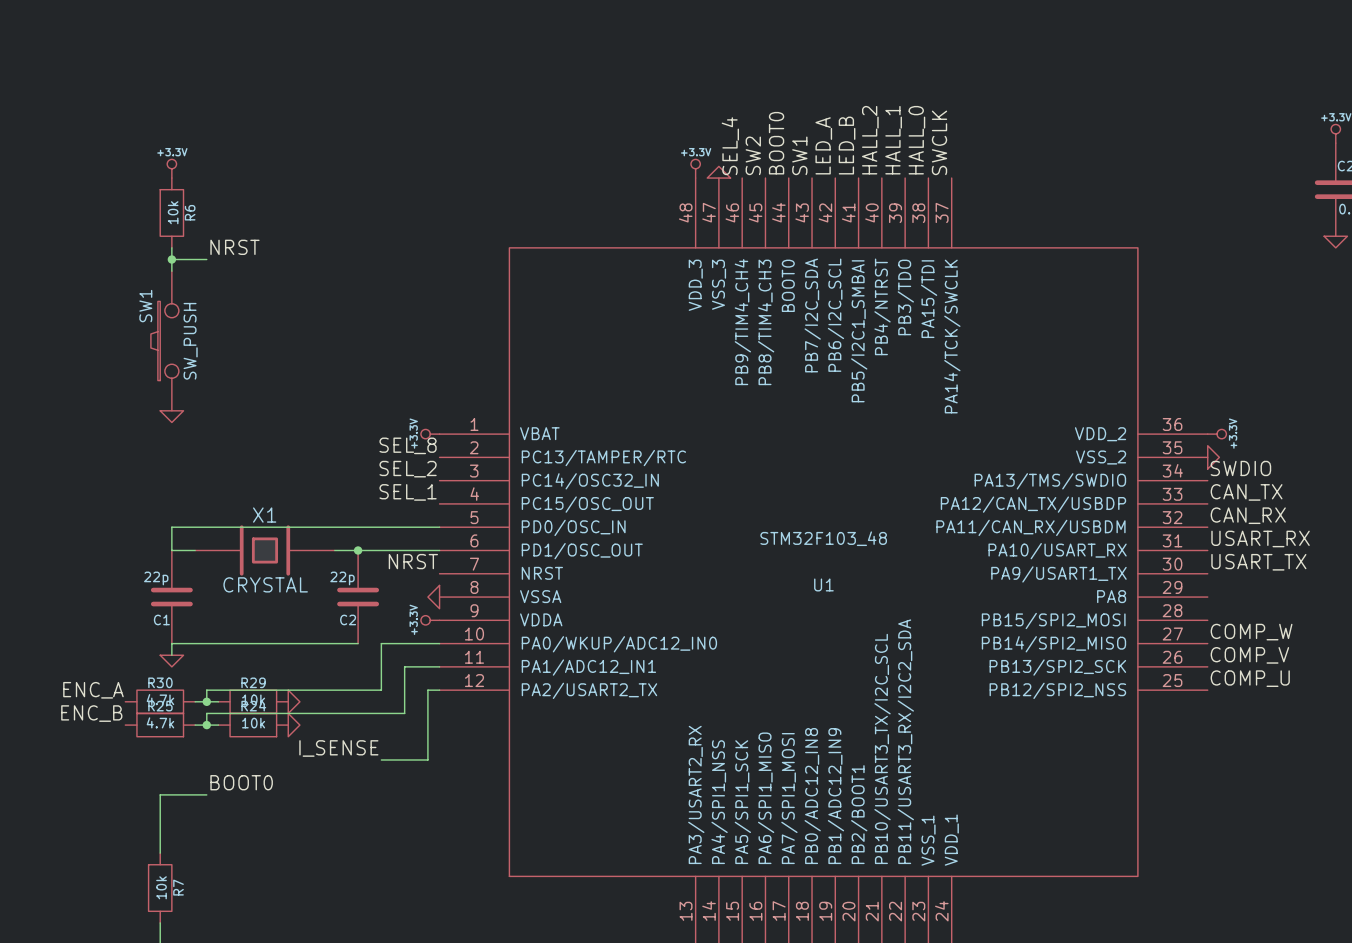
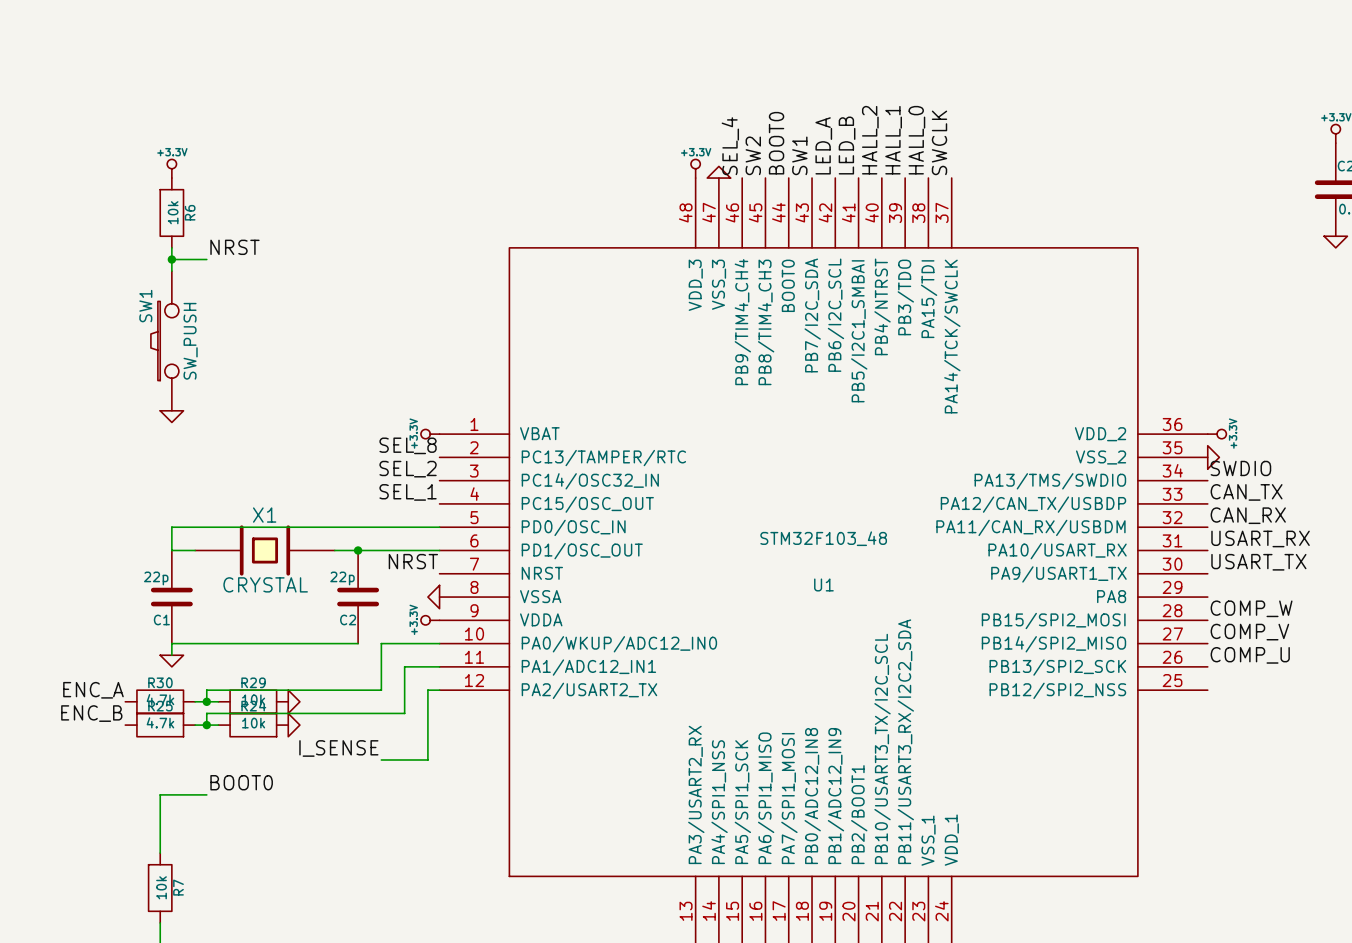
label: none -> COMP_W (1251, 608)
label: COMP_W (1251, 632) -> COMP_V (1249, 632)
label: COMP_V (1249, 655) -> COMP_U (1250, 655)
label: COMP_U (1250, 678) -> none

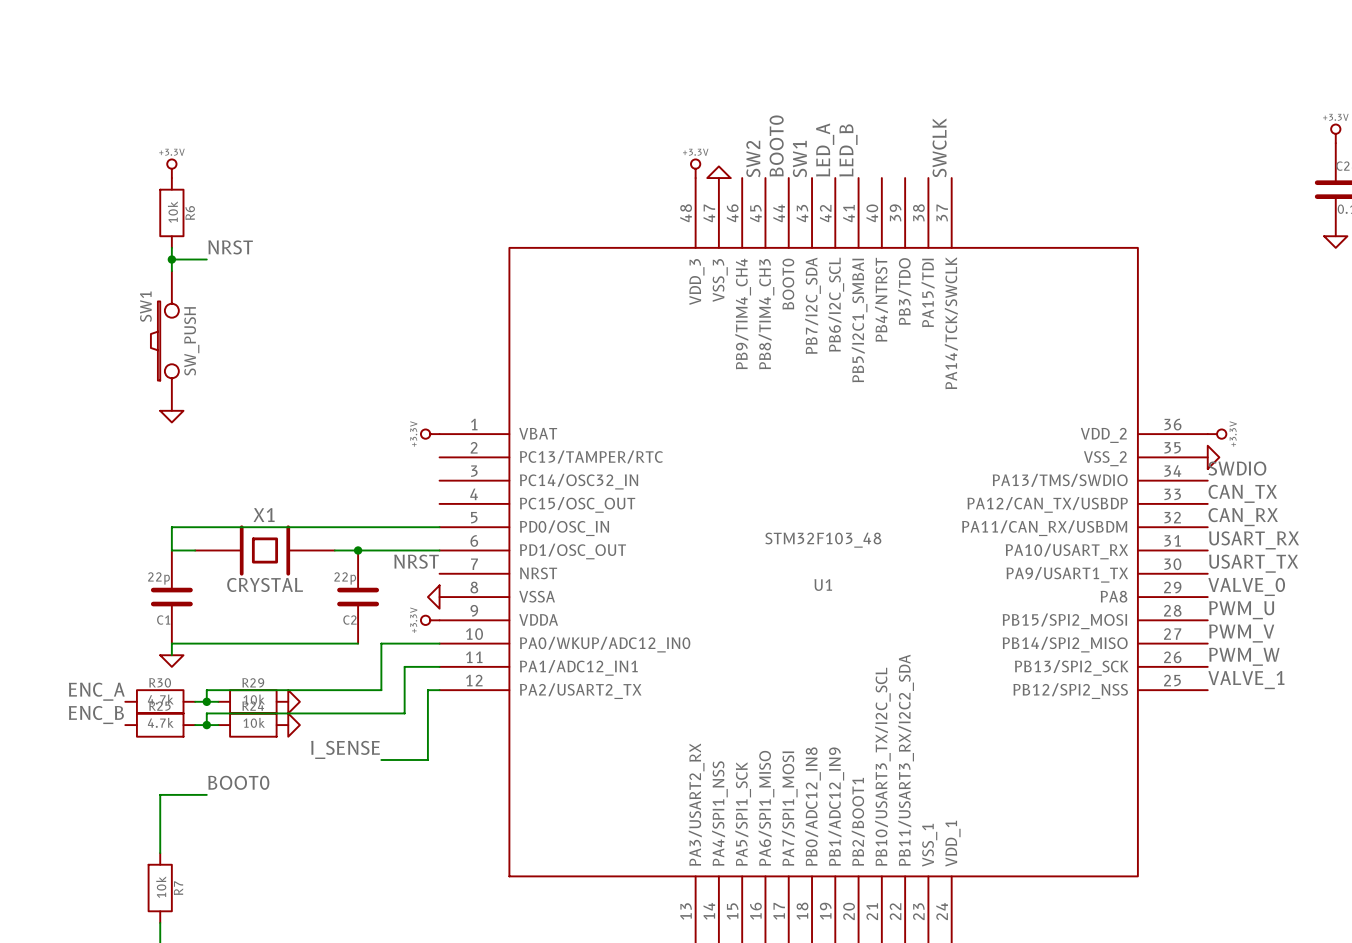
label: HALL_2 (870, 140) -> none
label: HALL_1 (893, 140) -> none
label: HALL_0 (916, 140) -> none
label: SEL_4 (730, 146) -> none
label: SEL_8 (408, 445) -> none
label: SEL_2 (408, 469) -> none
label: SEL_1 (408, 492) -> none
label: none -> VALVE_0 (1246, 586)
label: COMP_W (1251, 608) -> PWM_U (1241, 610)
label: COMP_V (1249, 632) -> PWM_V (1241, 633)
label: COMP_U (1250, 655) -> PWM_W (1244, 656)
label: none -> VALVE_1 (1246, 680)

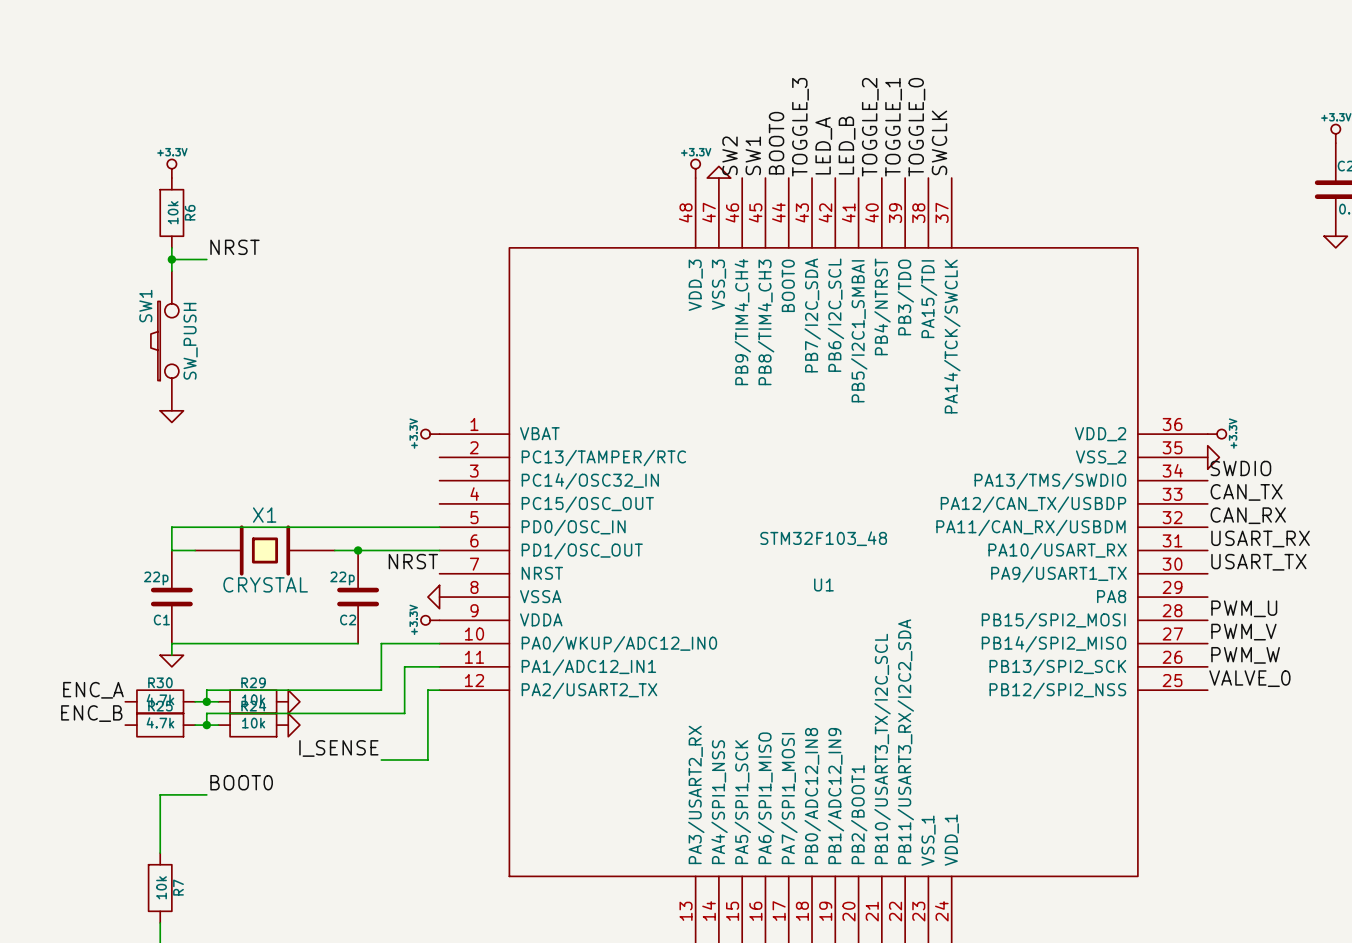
label: none -> TOGGLE_2 (870, 127)
label: none -> TOGGLE_1 (893, 127)
label: none -> TOGGLE_0 (916, 127)
label: none -> SW2 (730, 155)
label: SW2 (753, 159) -> SW1 (753, 155)
label: SW1 (799, 159) -> TOGGLE_3 (800, 127)
label: VALVE_0 (1246, 586) -> none
label: VALVE_1 (1246, 680) -> VALVE_0 (1249, 678)

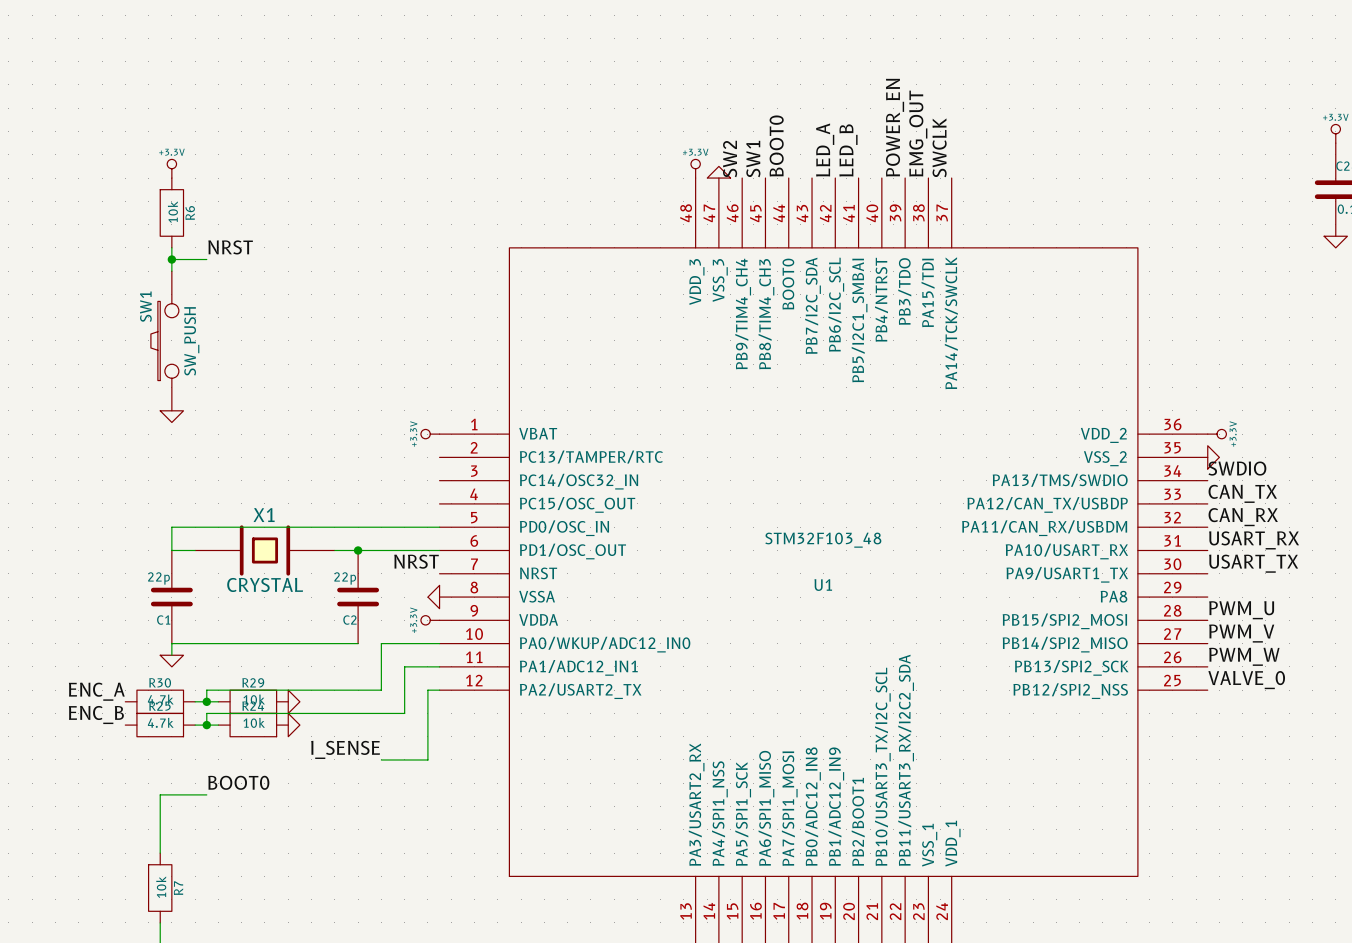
label: TOGGLE_3 (800, 127) -> none
label: TOGGLE_2 (870, 127) -> none
label: TOGGLE_1 (893, 127) -> POWER_EN (895, 127)
label: TOGGLE_0 (916, 127) -> EMG_OUT (918, 133)

